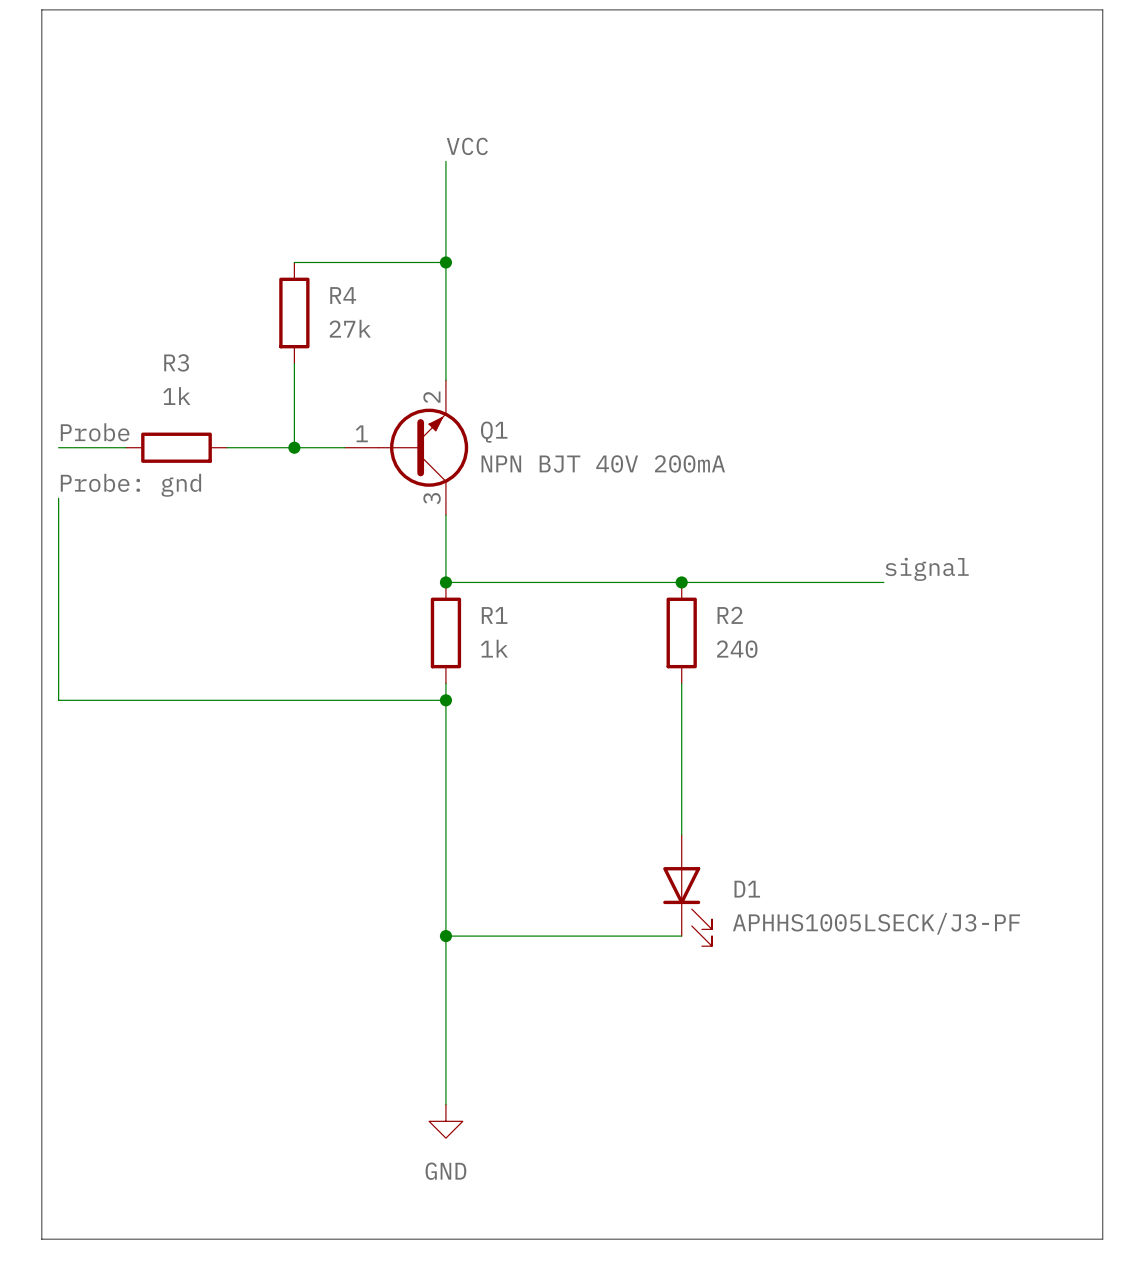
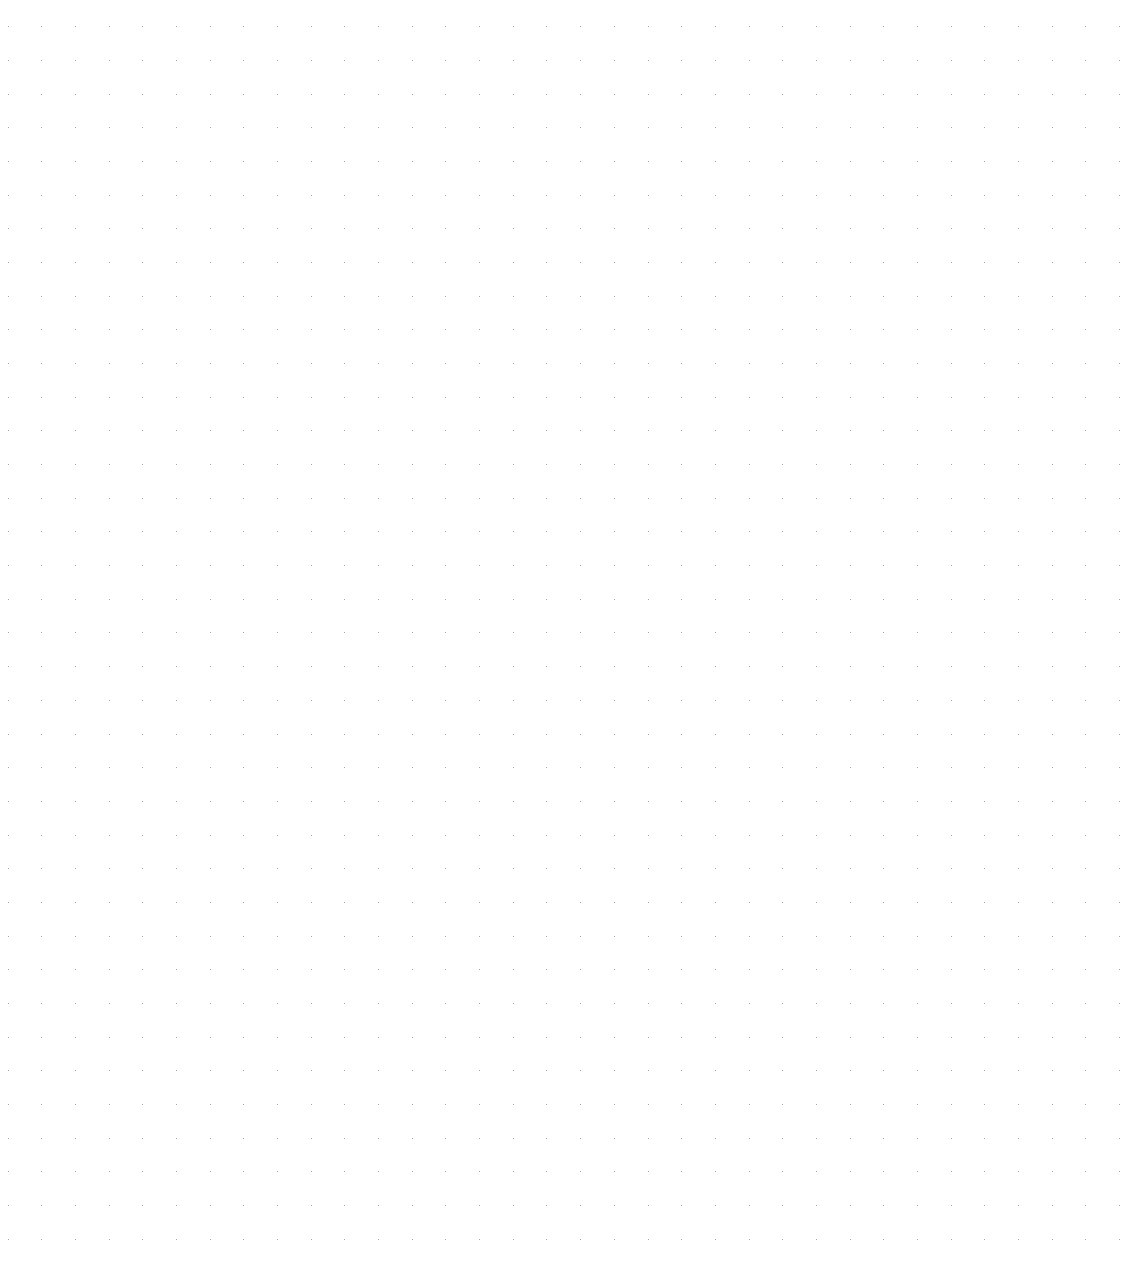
line: (41, 9) (1102, 9) (1102, 1239) (41, 1239) (41, 9) -> none
label: VCC (467, 146) -> none
wire: (445, 161) (445, 380) -> none
wire: (294, 262) (445, 262) -> none
junction: (445, 262) -> none
R4: 27k (294, 313) -> none
wire: (294, 363) (294, 447) -> none
label: Probe (95, 432) -> none
wire: (58, 447) (125, 447) -> none
R3: 1k (176, 447) -> none
wire: (227, 447) (344, 447) -> none
junction: (294, 447) -> none
Q1: NPN BJT 40V 200mA (406, 447) -> none
label: Probe: gnd (130, 485) -> none
wire: (58, 498) (58, 700) (445, 700) -> none
wire: (445, 515) (445, 582) (883, 582) -> none
label: signal (927, 569) -> none
junction: (445, 582) -> none
junction: (681, 582) -> none
R1: 1k (445, 632) -> none
R2: 240 (681, 632) -> none
wire: (445, 683) (445, 1104) -> none
wire: (681, 683) (681, 835) -> none
junction: (445, 700) -> none
D1: APHHS1005LSECK/J3-PF (687, 890) -> none
wire: (445, 936) (681, 936) -> none
junction: (445, 936) -> none
power symbol: GND (445, 1121) -> none

